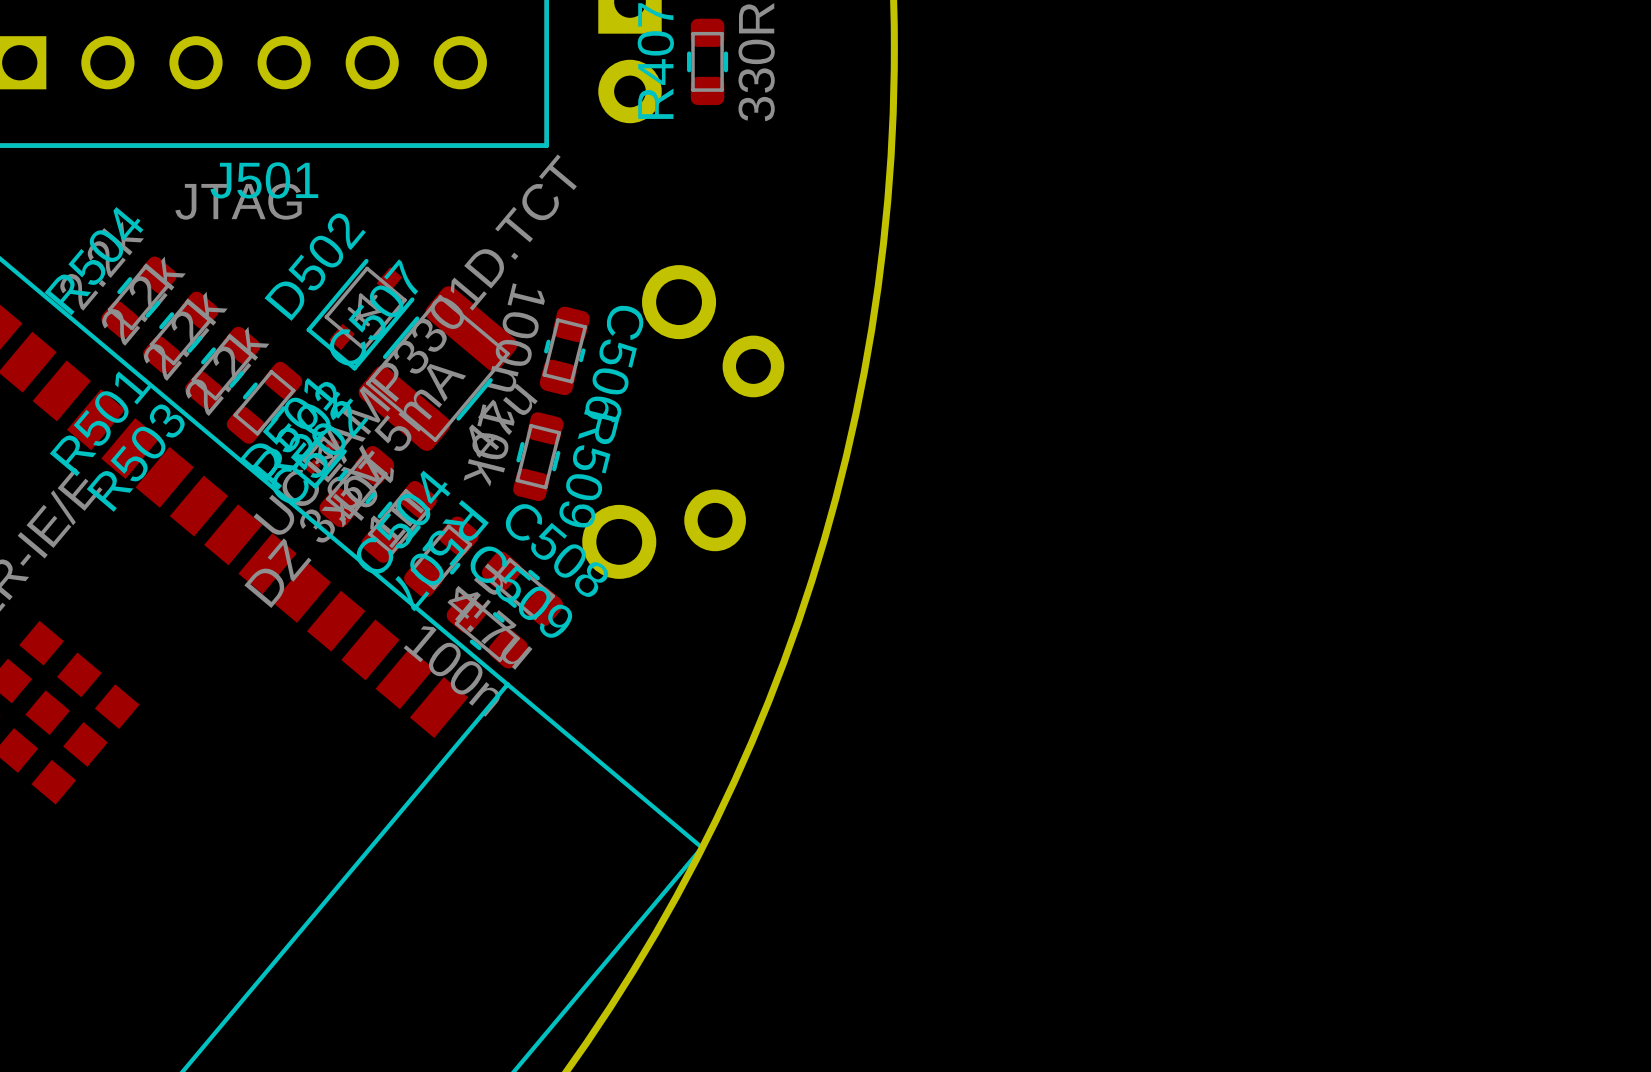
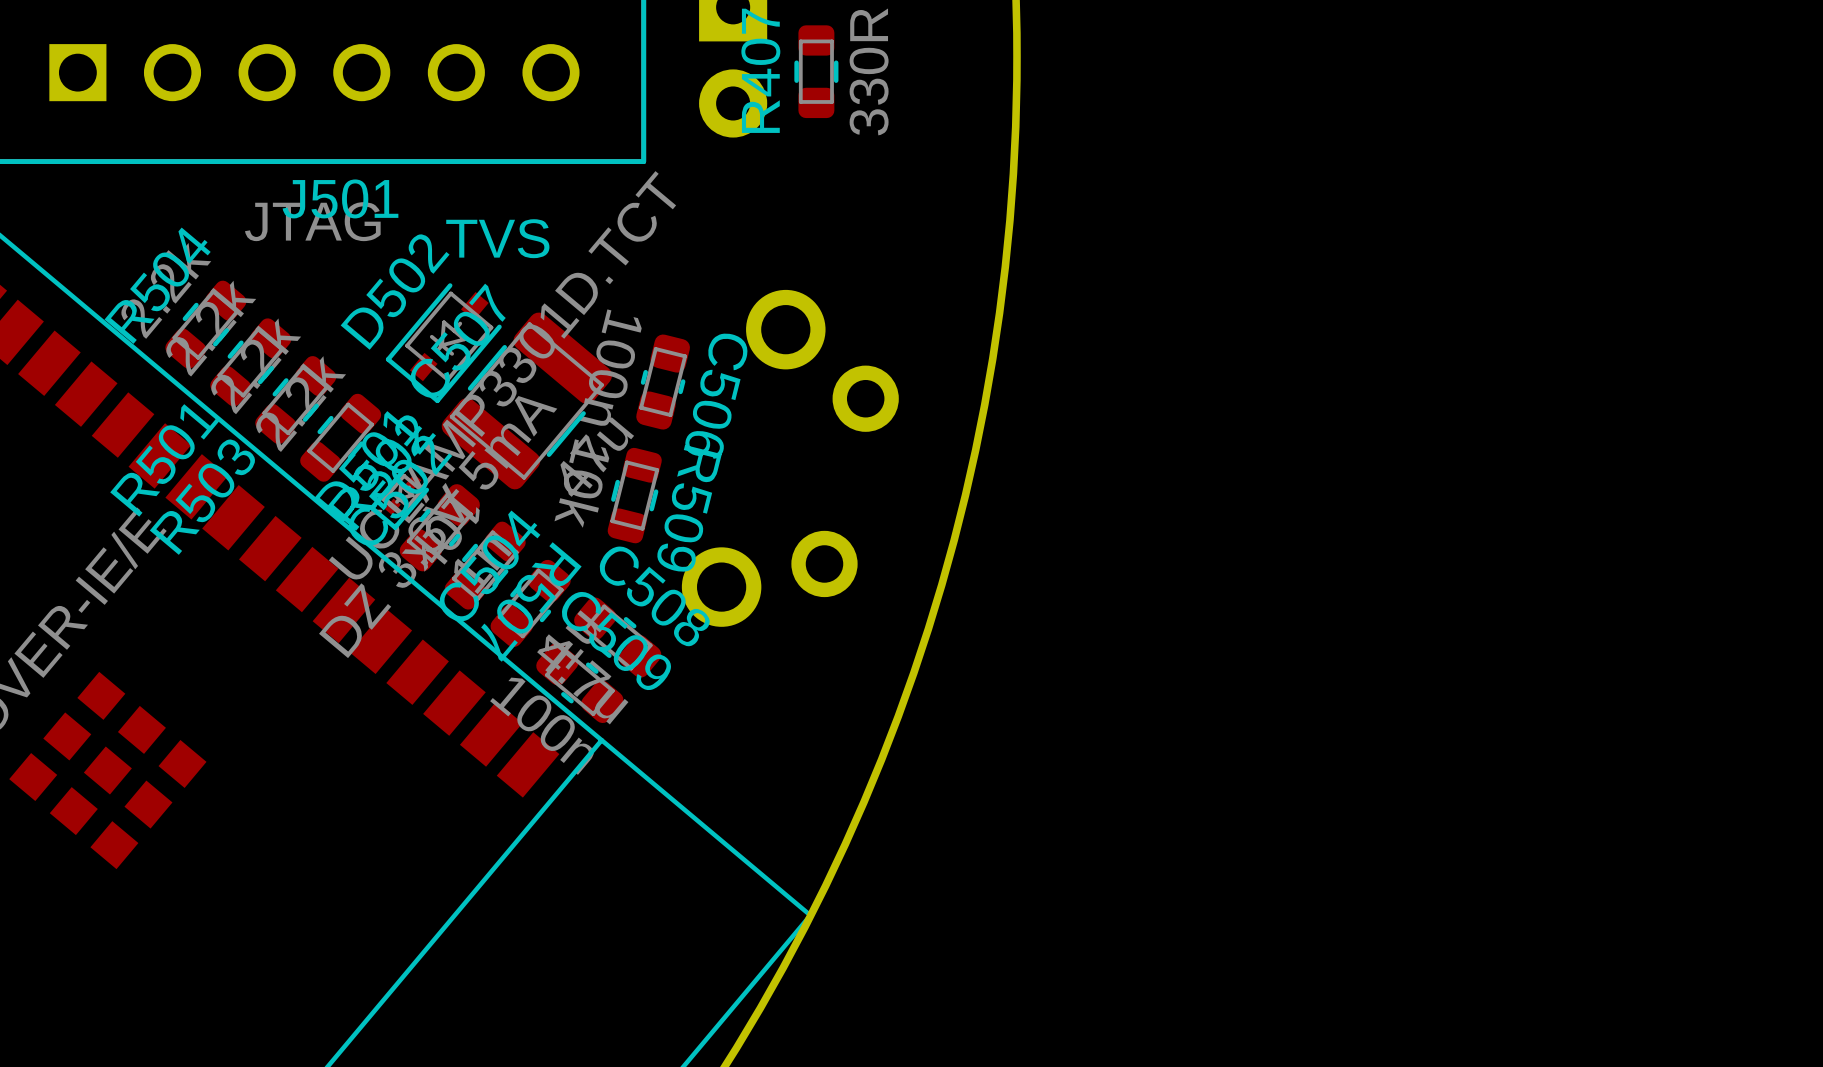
text: none -> TVS (497, 238)

